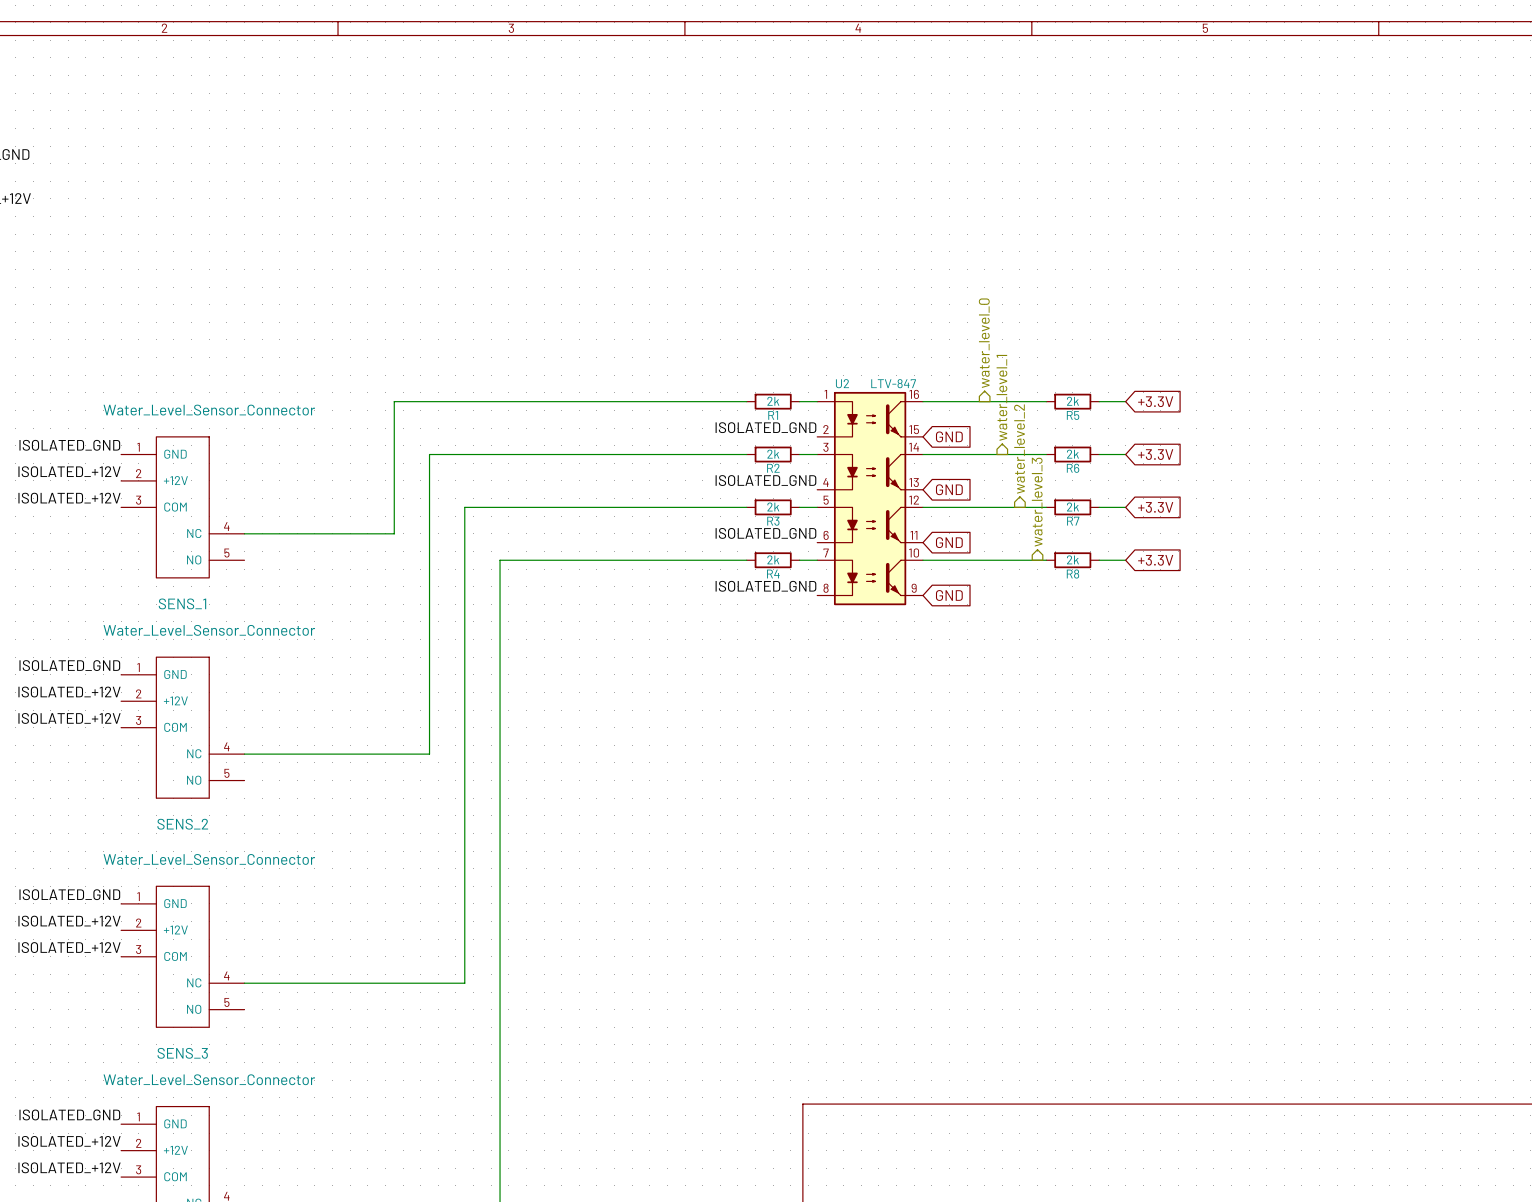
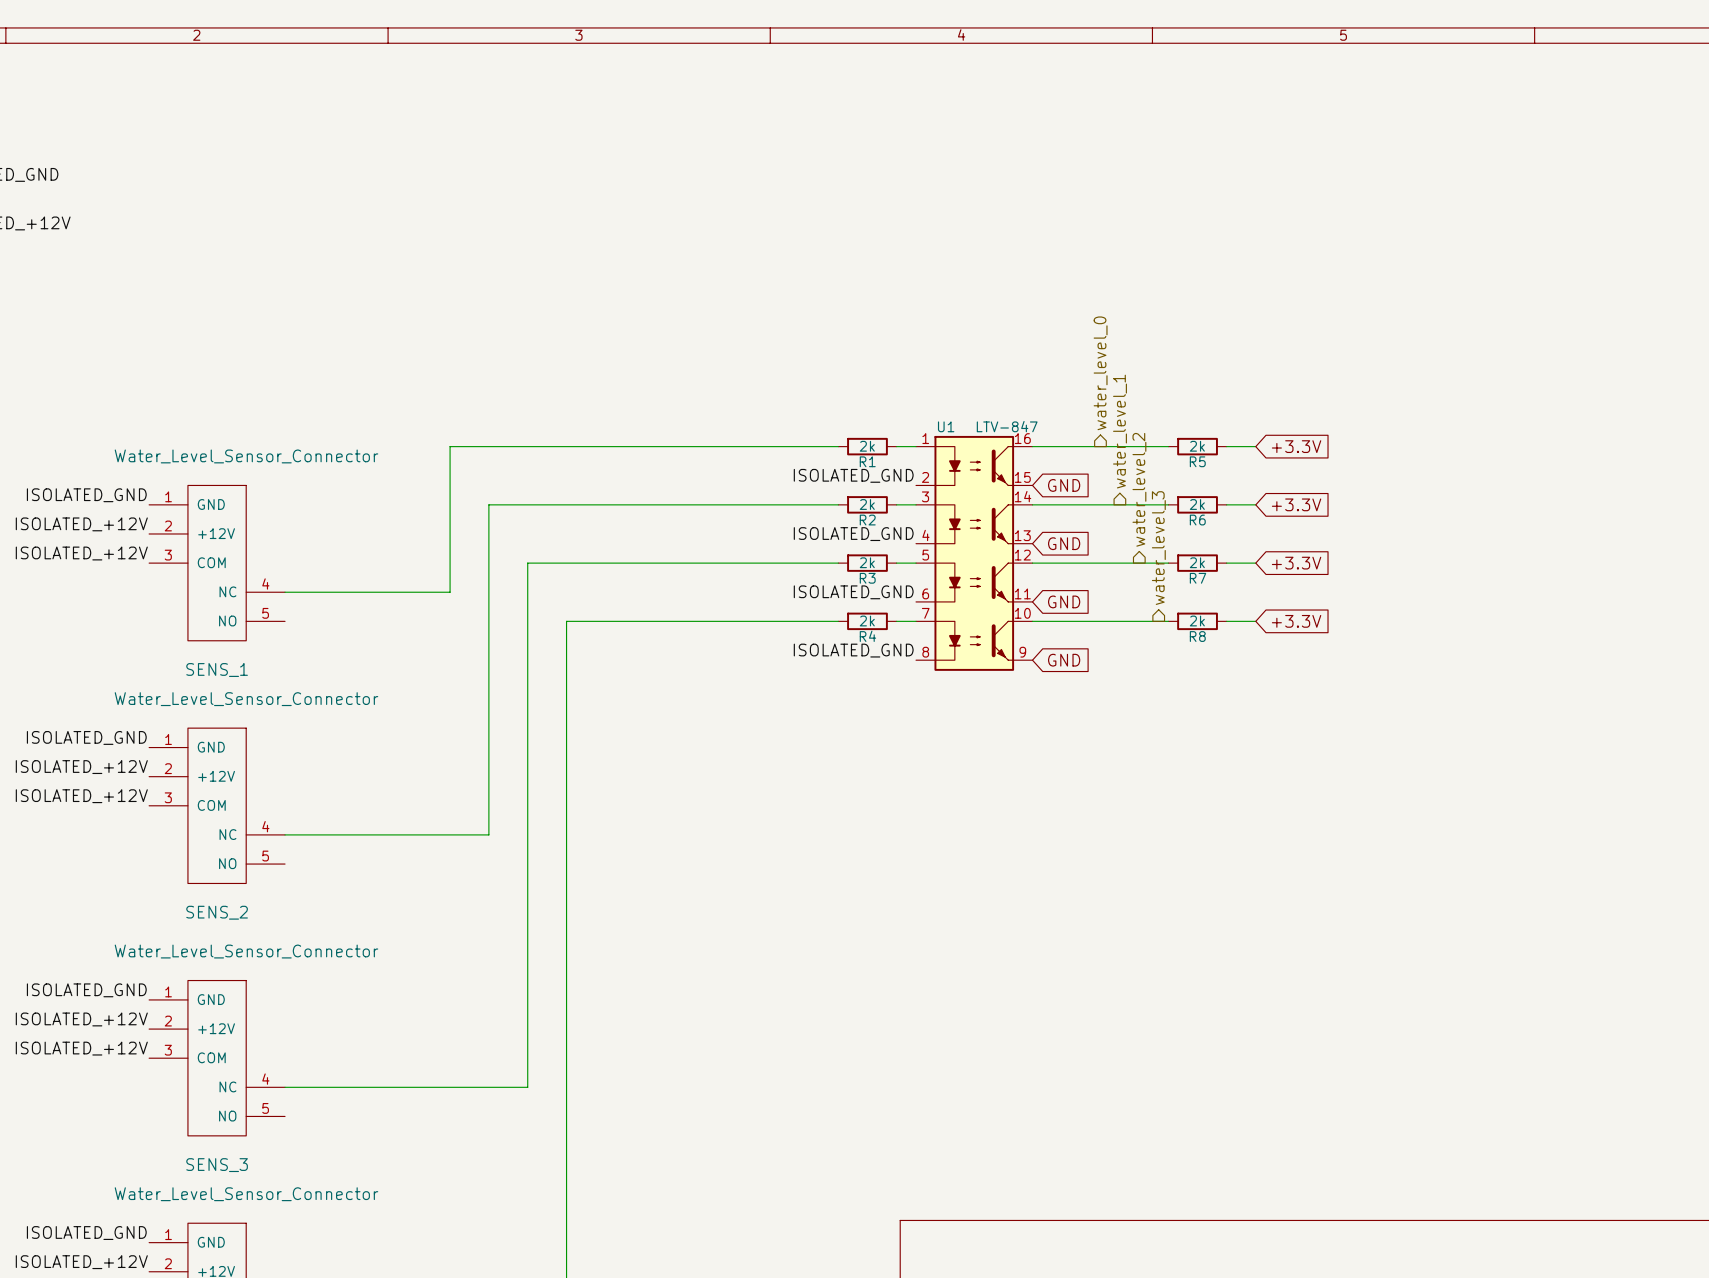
U2 name: U2 (842, 383) -> U1 (946, 426)

